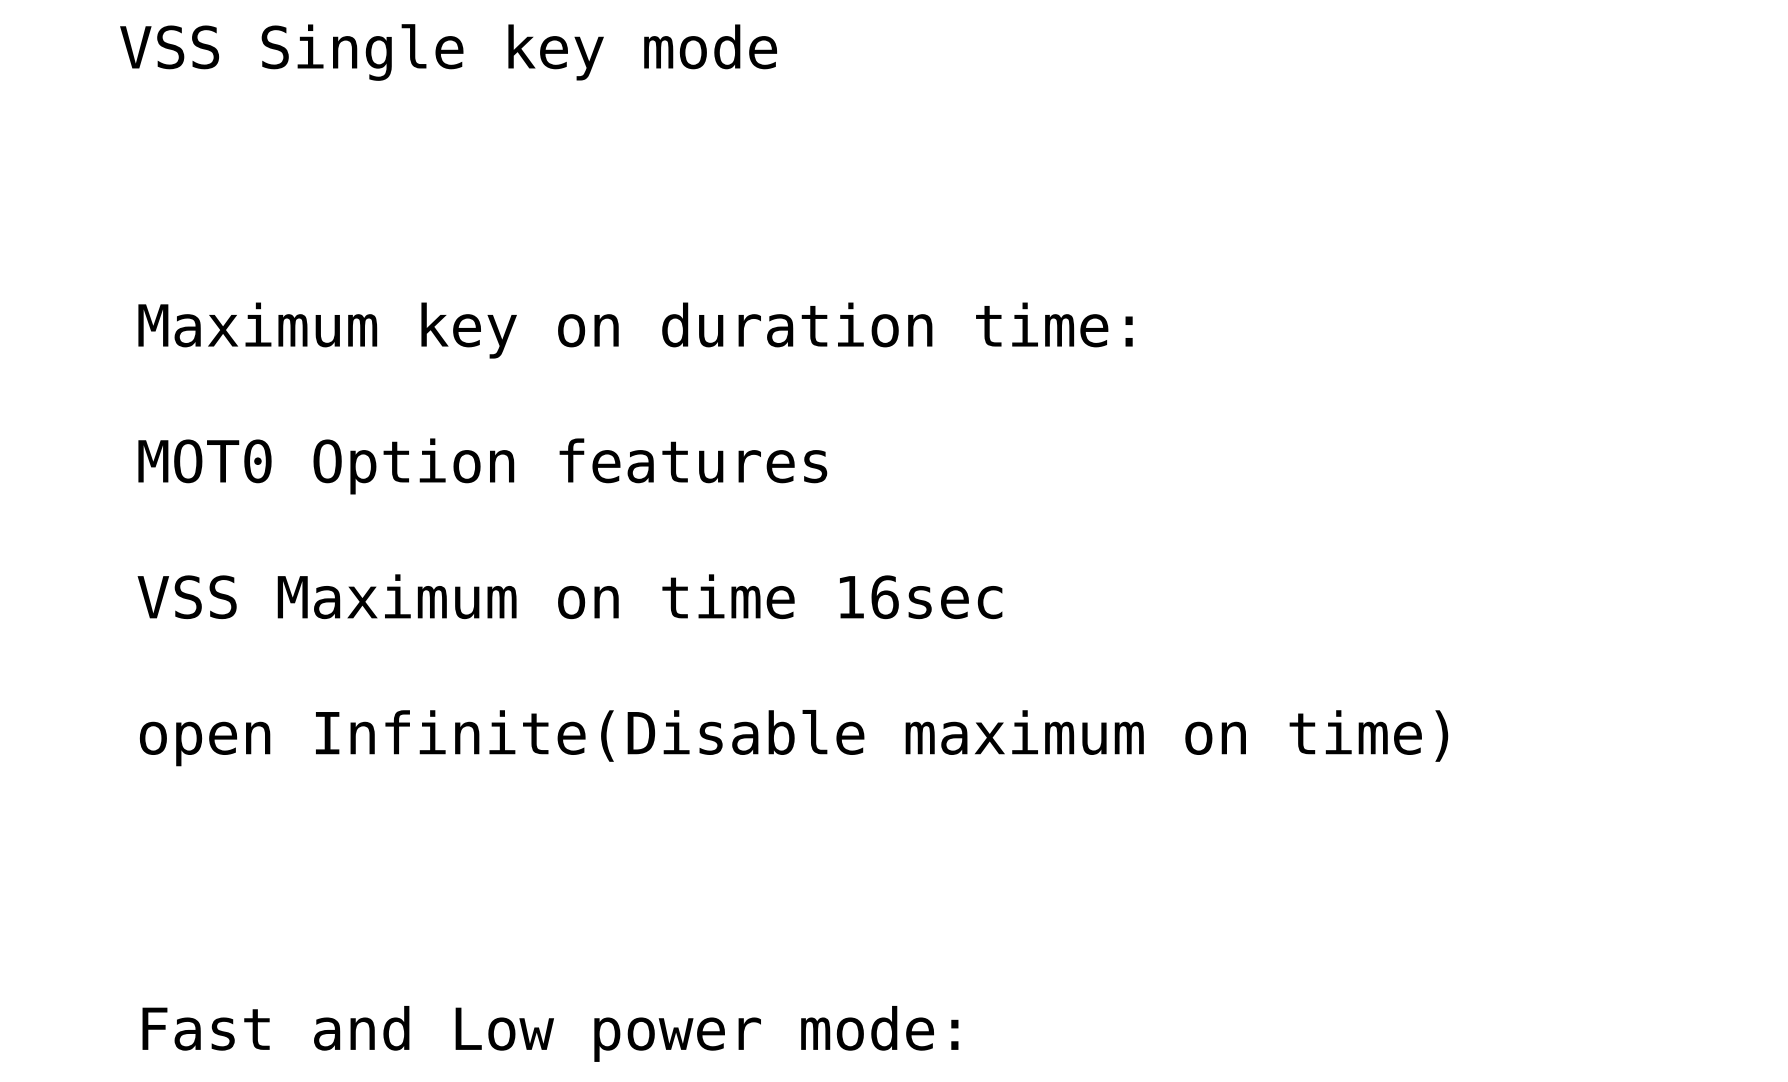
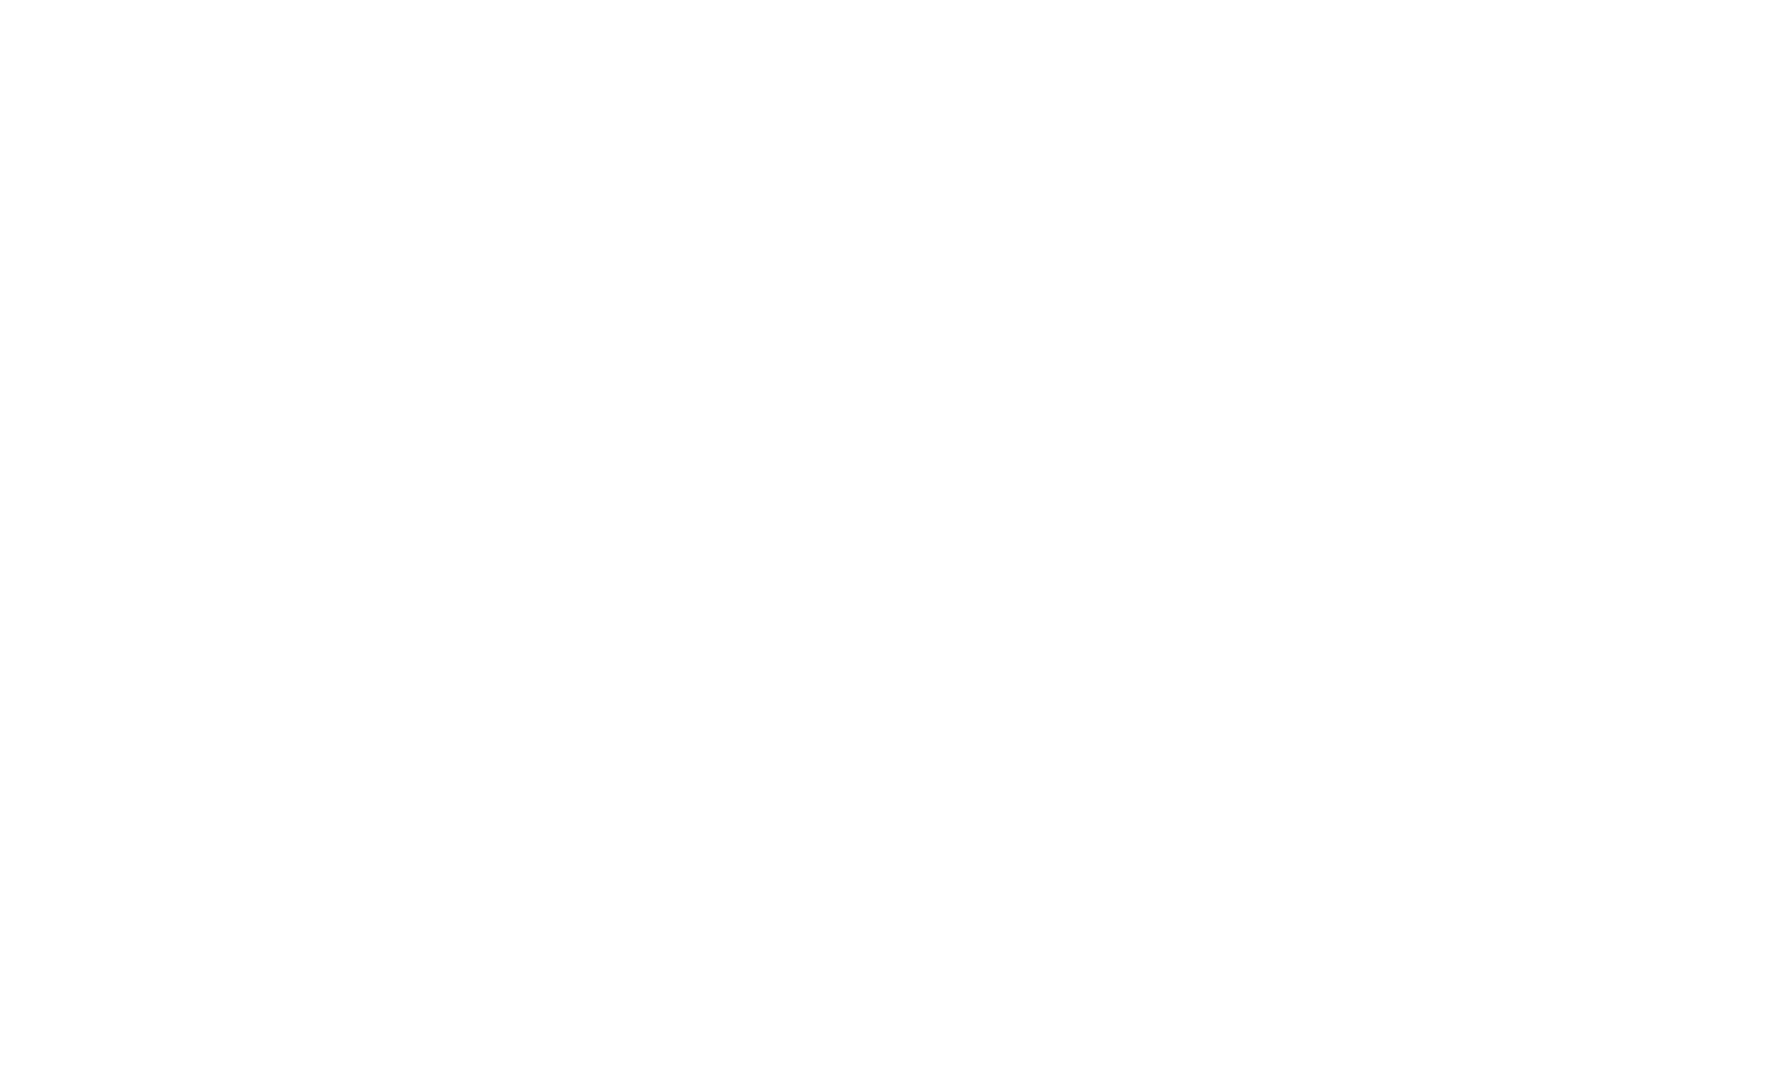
text: VSS Single key mode (448, 52) -> none
text: Maximum key on duration time: (635, 330) -> none
text: MOT0 Option features (482, 466) -> none
text: VSS Maximum on time 16sec (569, 596) -> none
text: open Infinite(Disable maximum on time) (794, 738) -> none
text: Fast and Low power mode: (550, 1033) -> none

